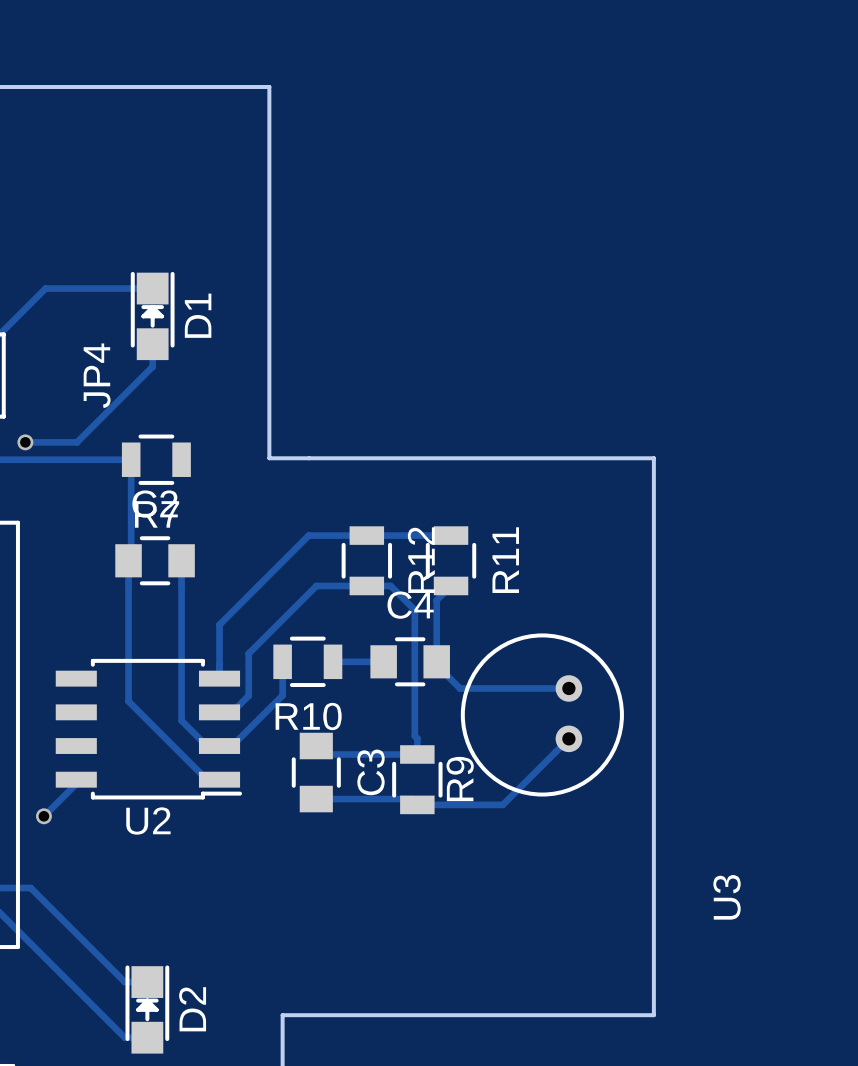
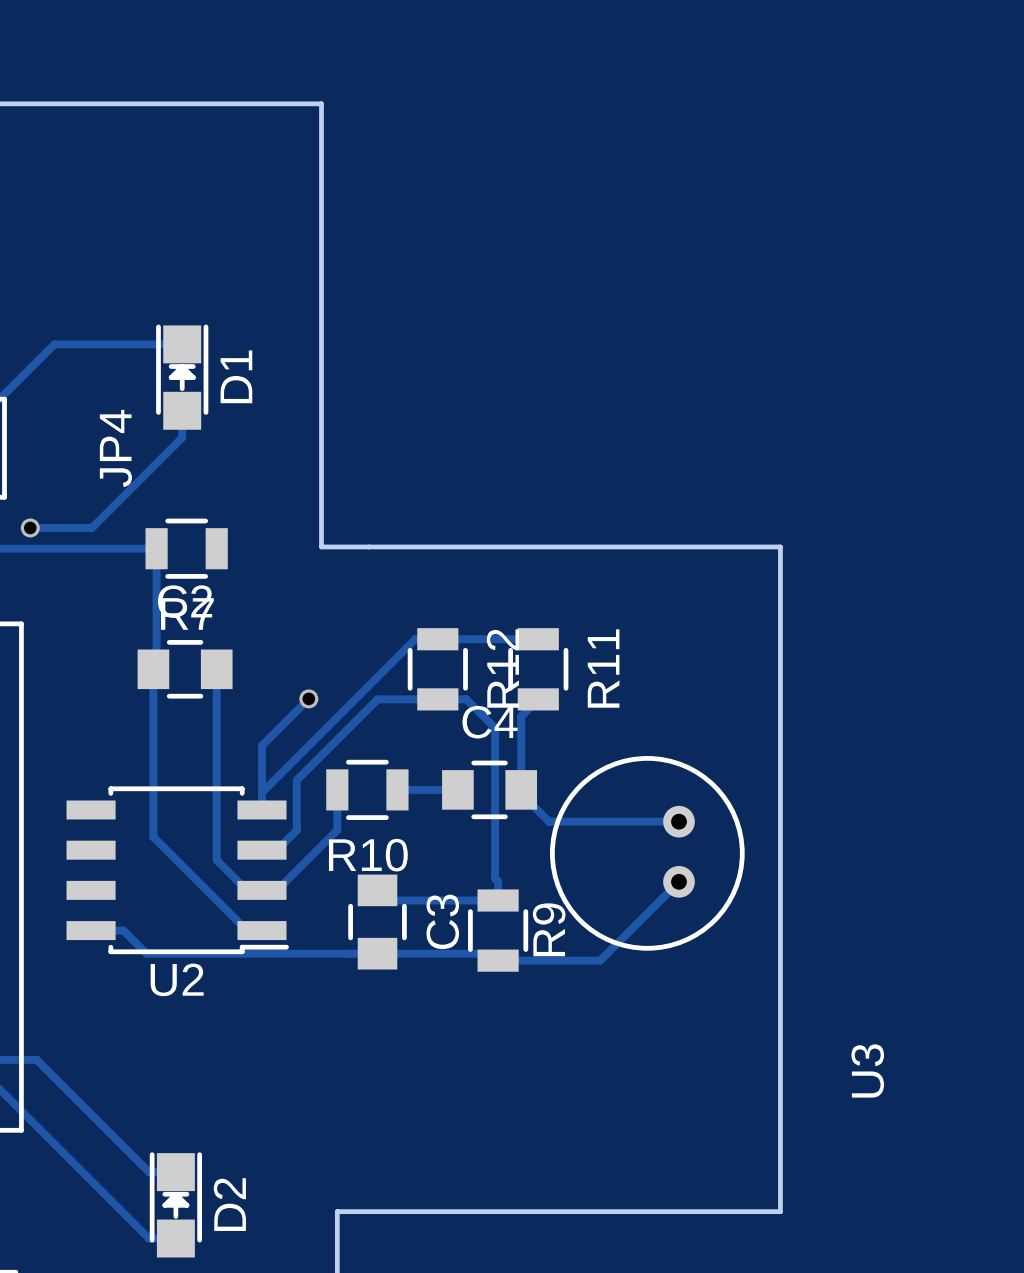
track: (347, 535) (308, 535) (258, 585) -> (415, 639) (261, 792)
via: none -> (308, 698)
track: (76, 779) (76, 783) (43, 816) -> (91, 930) (123, 930) (146, 953) (377, 953)
via: (43, 816) -> none

